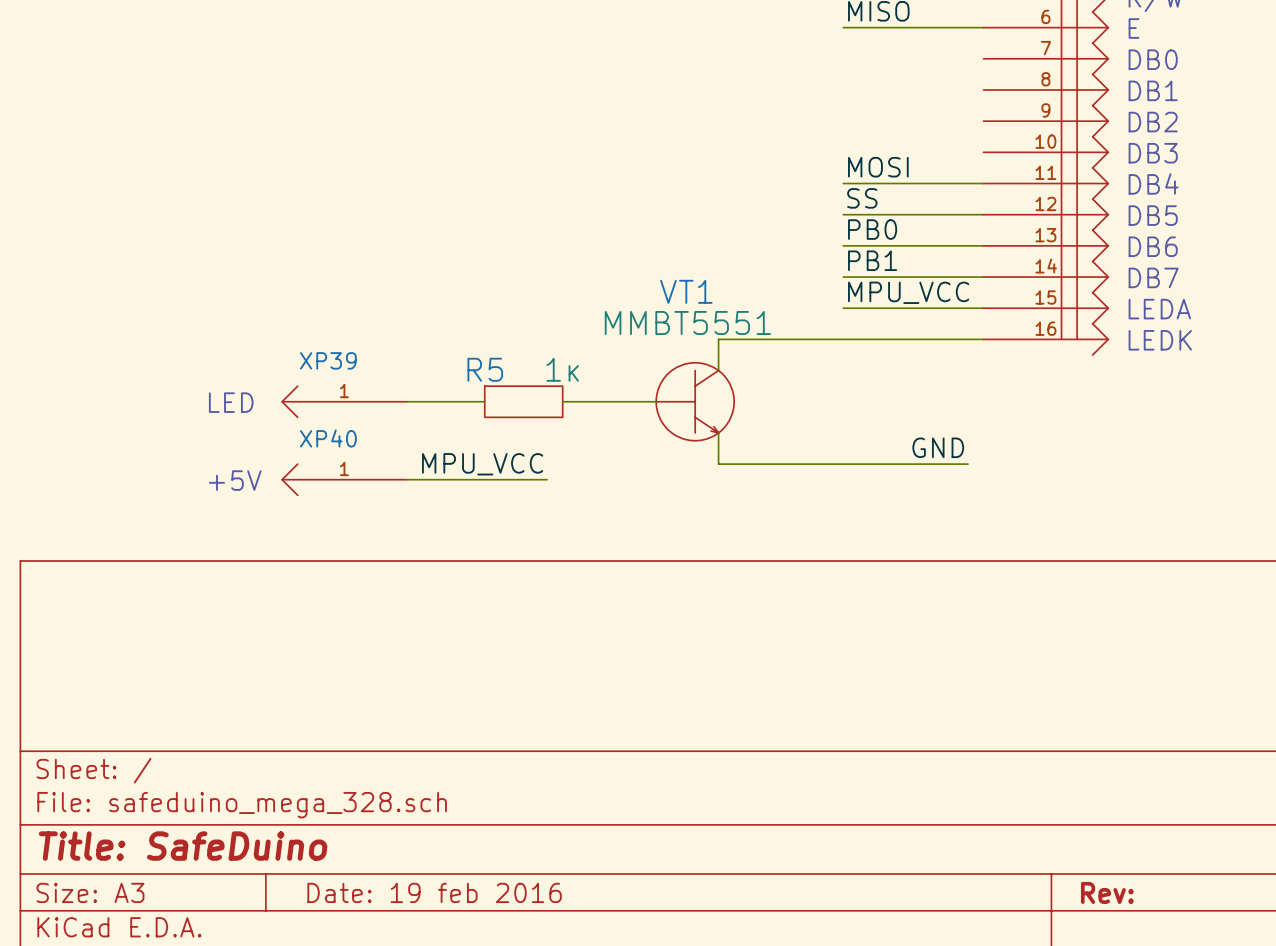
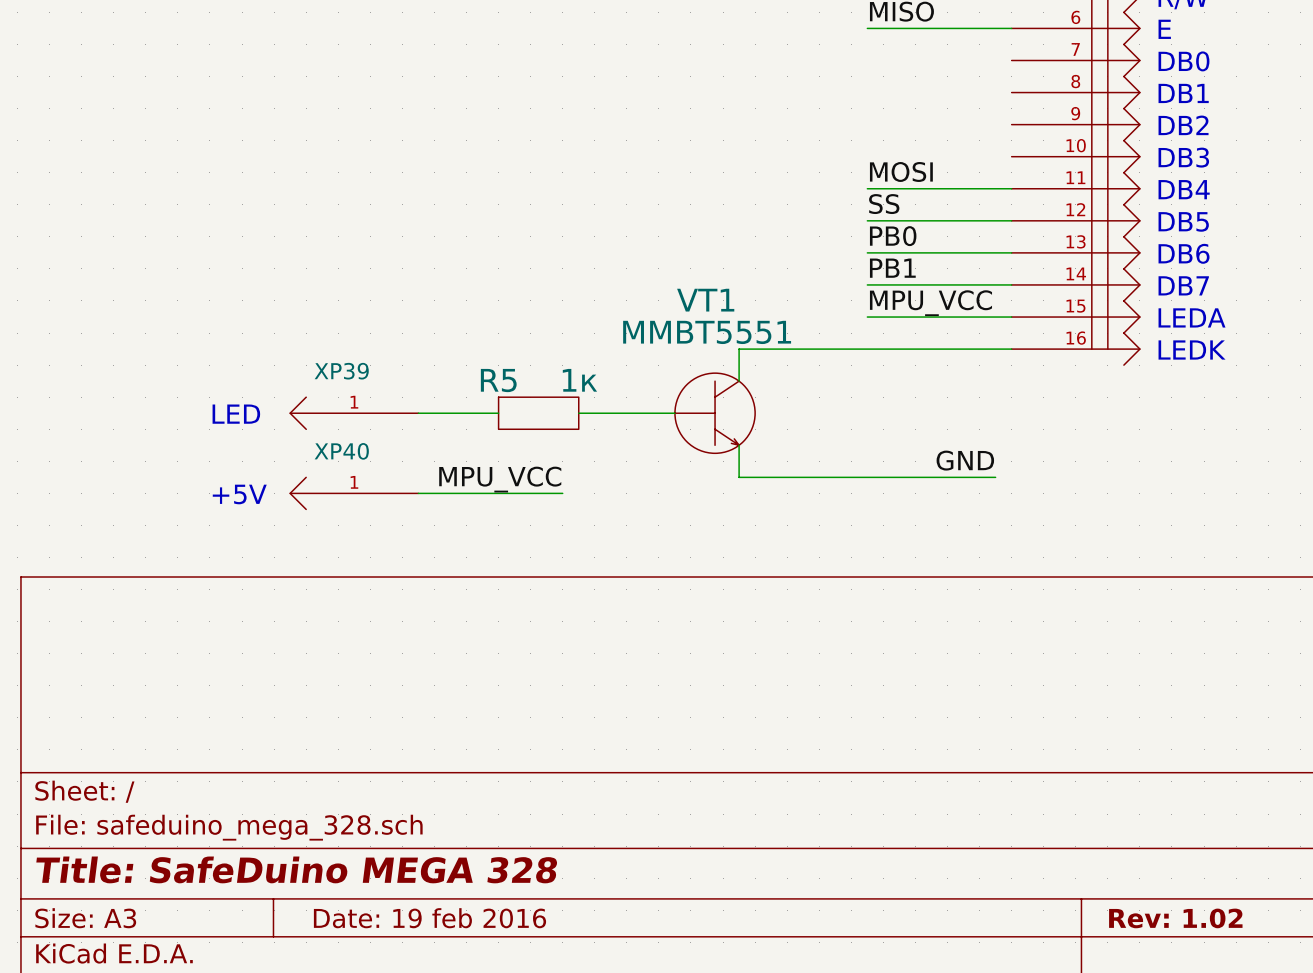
title block: Title: SafeDuino (183, 846) -> Title: SafeDuino MEGA 328 (296, 869)
title block: Rev: (1107, 892) -> Rev: 1.02 (1175, 918)

